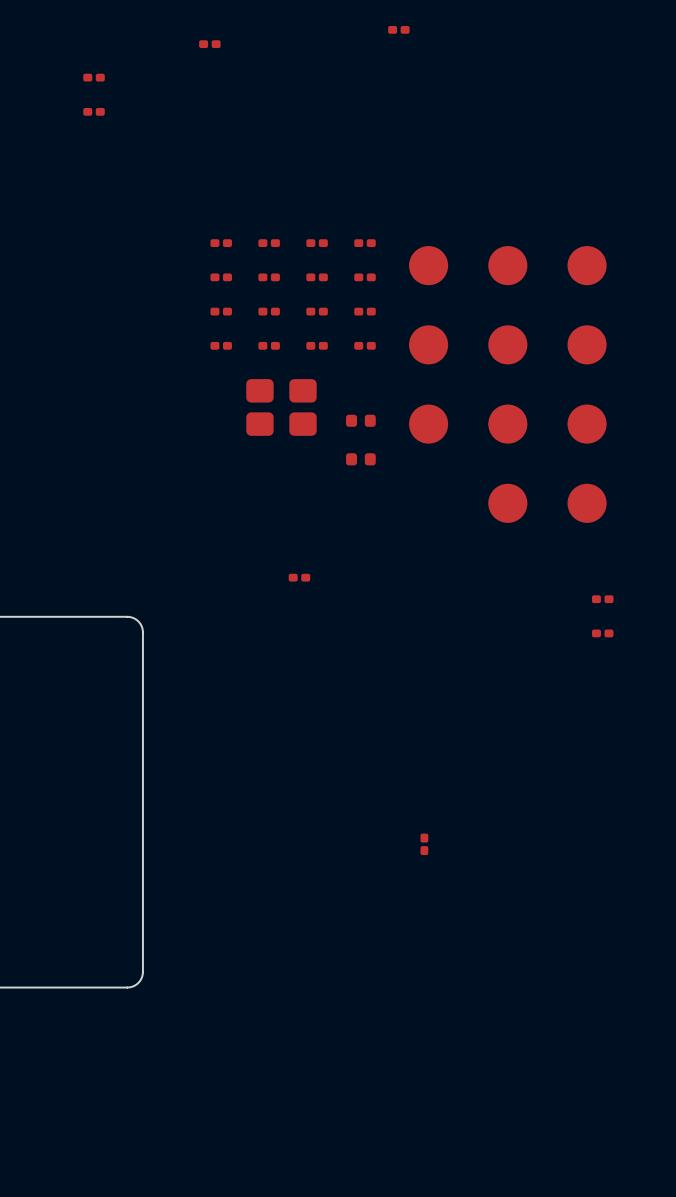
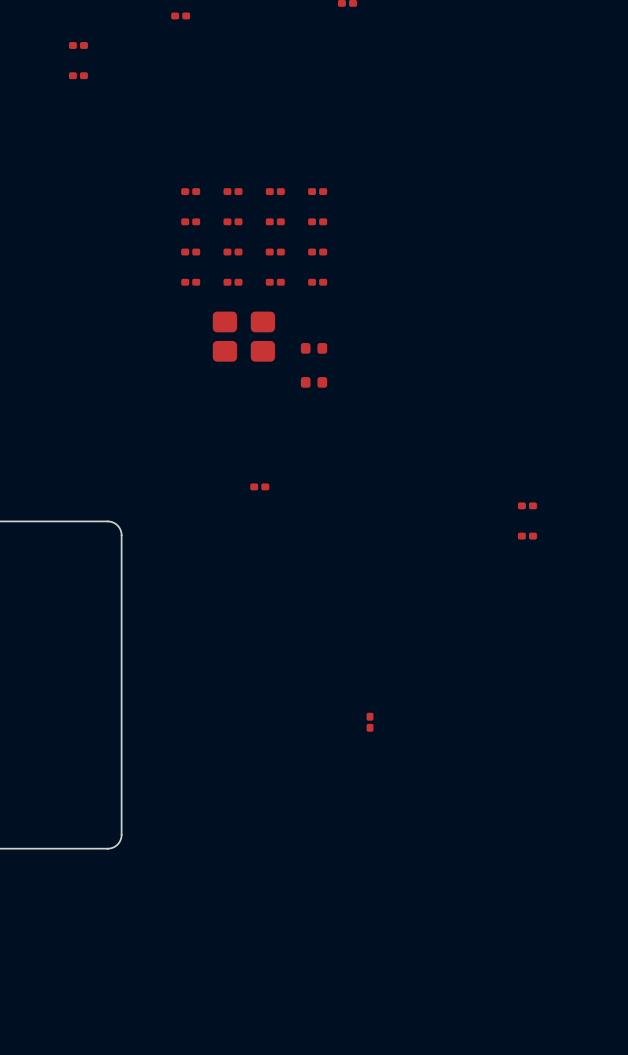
part: (428, 265) -> none
part: (507, 265) -> none
part: (587, 265) -> none
part: (428, 344) -> none
part: (507, 344) -> none
part: (587, 344) -> none
part: (428, 424) -> none
part: (507, 424) -> none
part: (587, 424) -> none
part: (507, 503) -> none
part: (587, 503) -> none

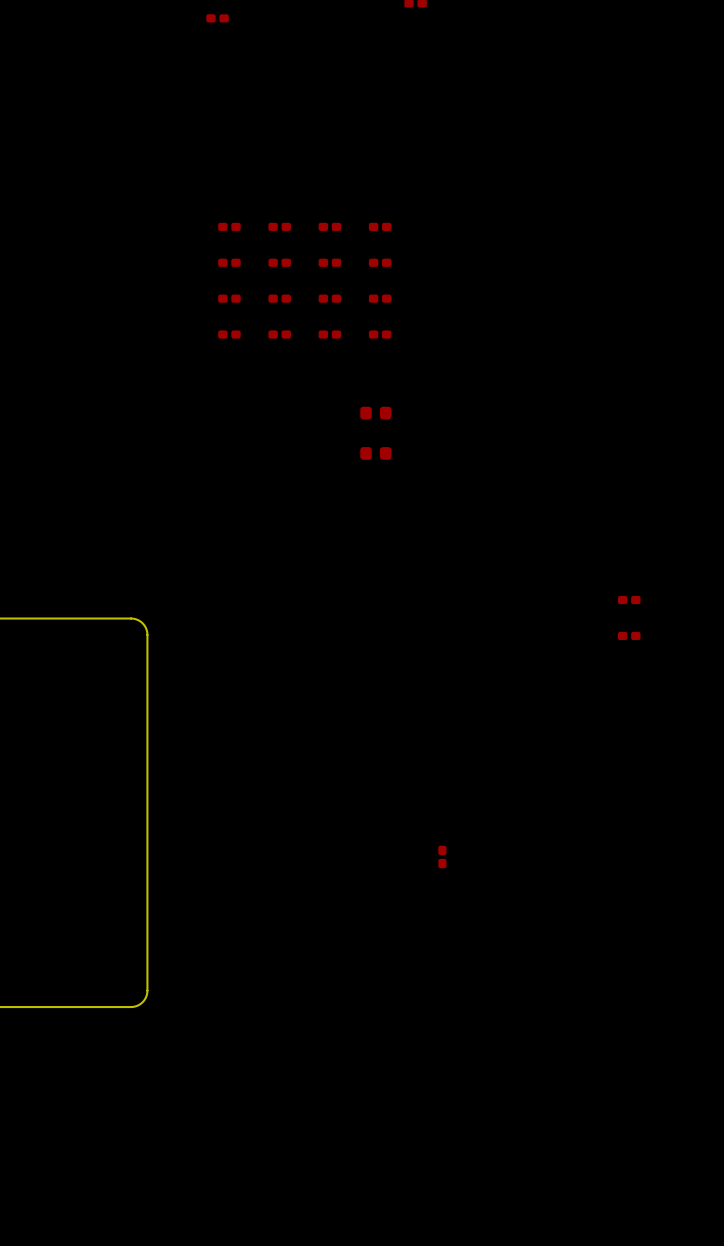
part: (78, 45) -> none
part: (78, 75) -> none
part: (243, 336) -> none
part: (259, 486) -> none

